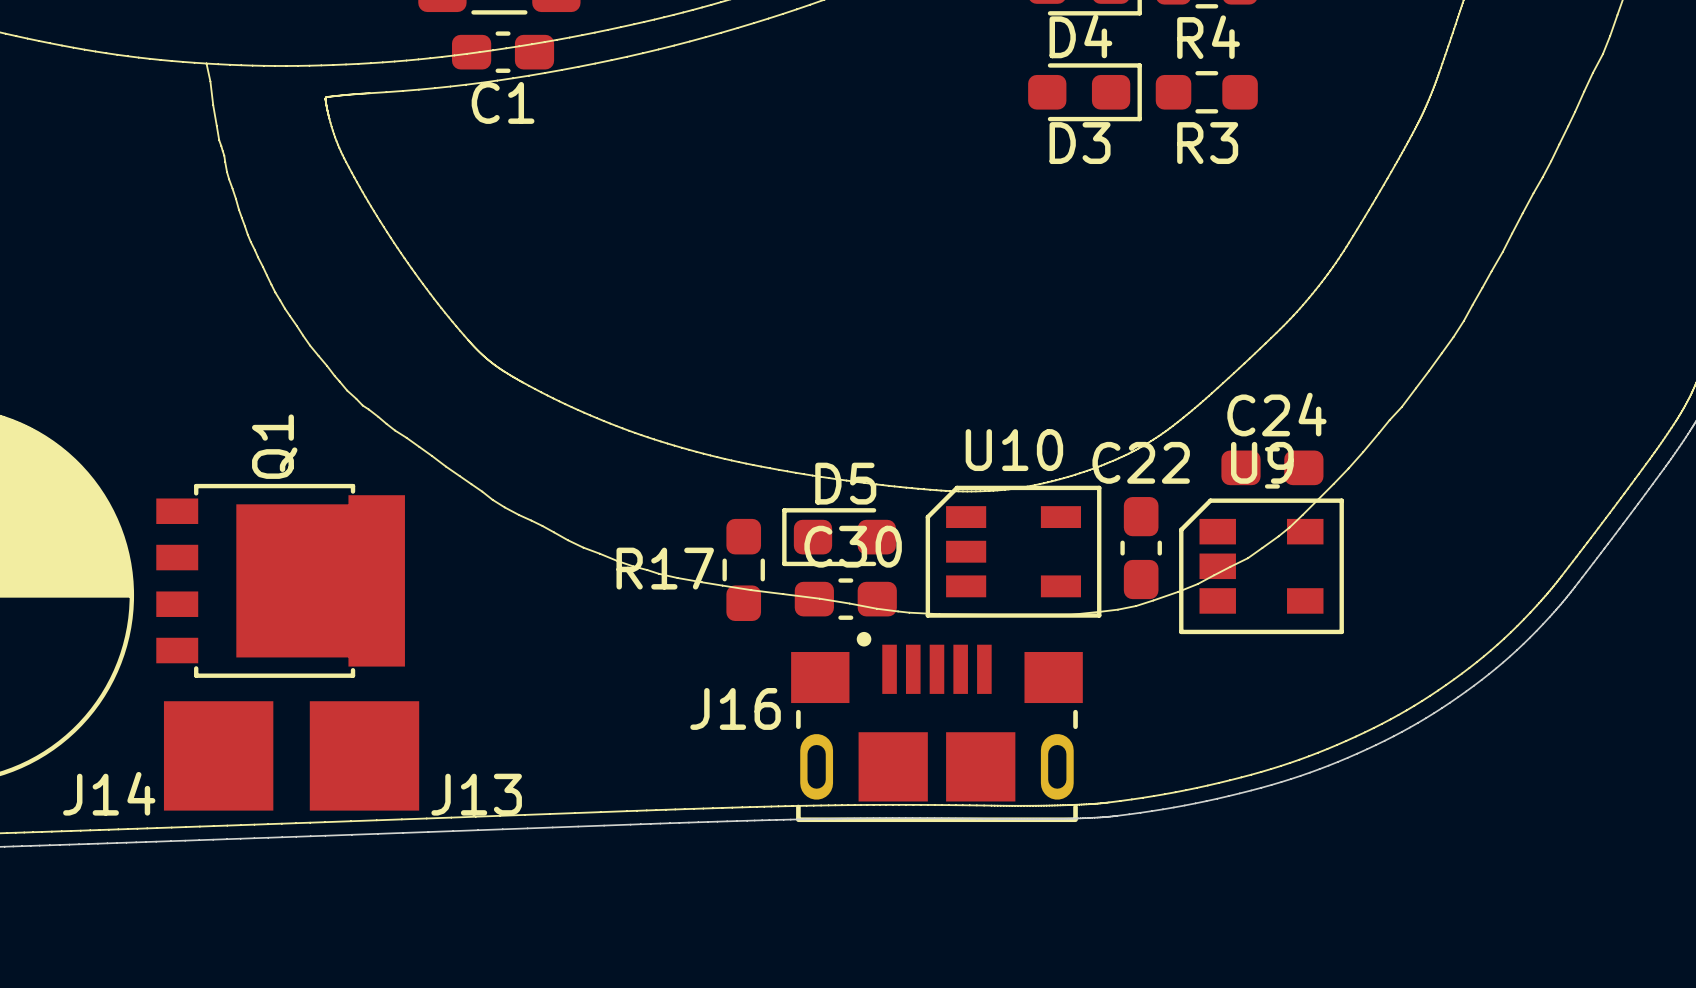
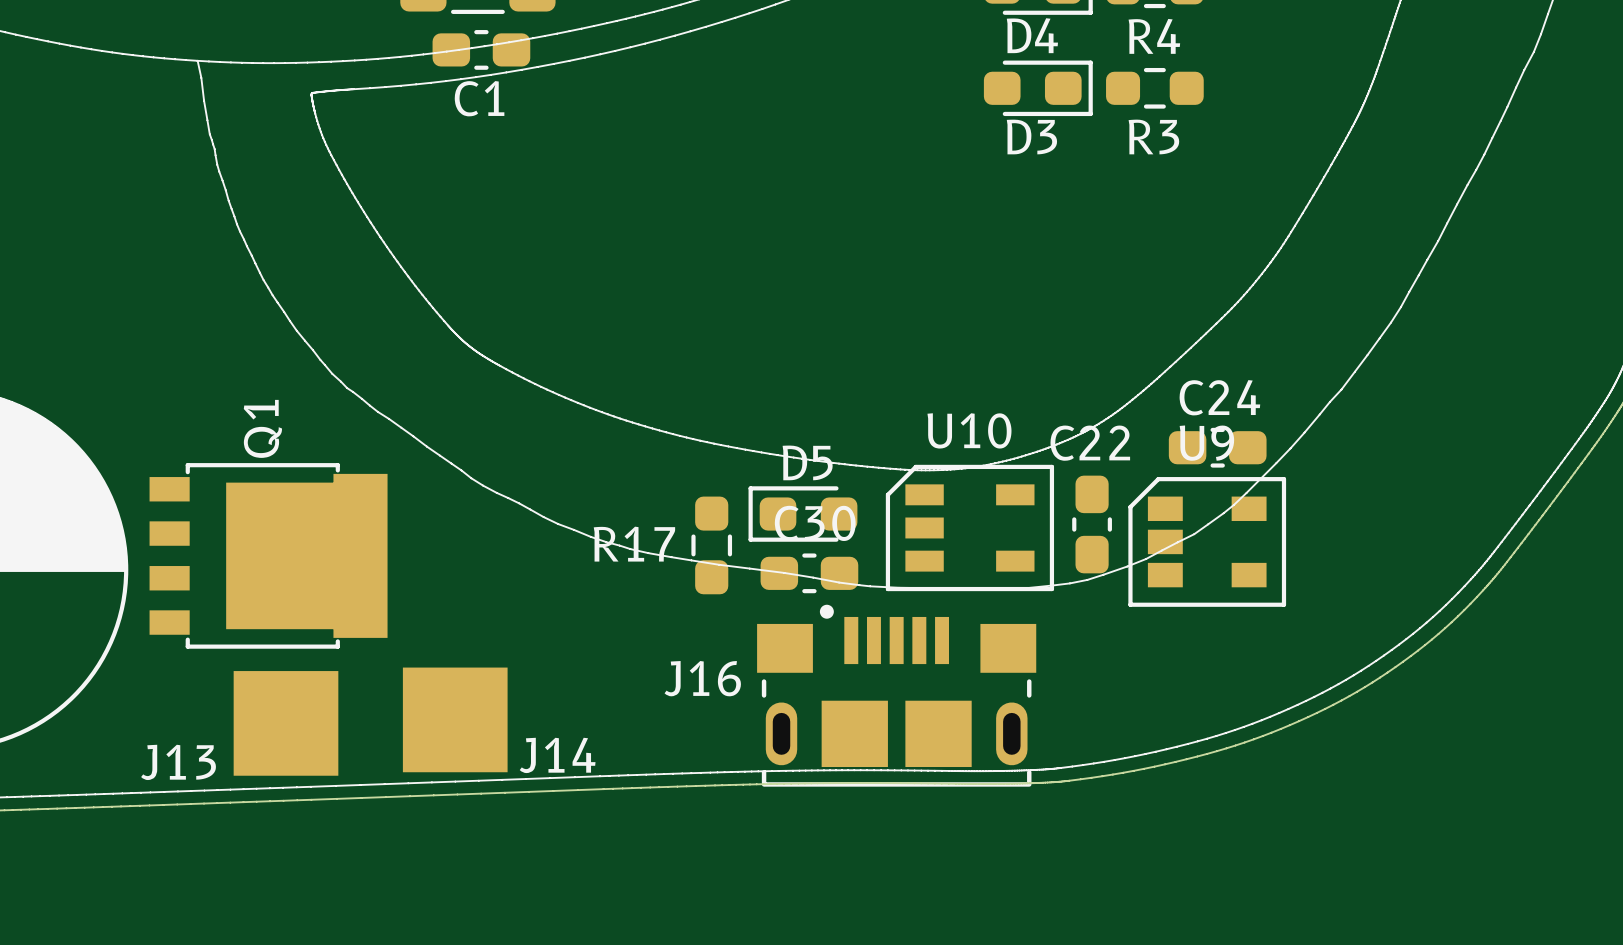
J14 position: (218, 755) -> (455, 719)
J13 position: (364, 755) -> (286, 723)
J14 name position: J14 (109, 793) -> J14 (557, 755)
J13 name position: J13 (476, 794) -> J13 (178, 762)

